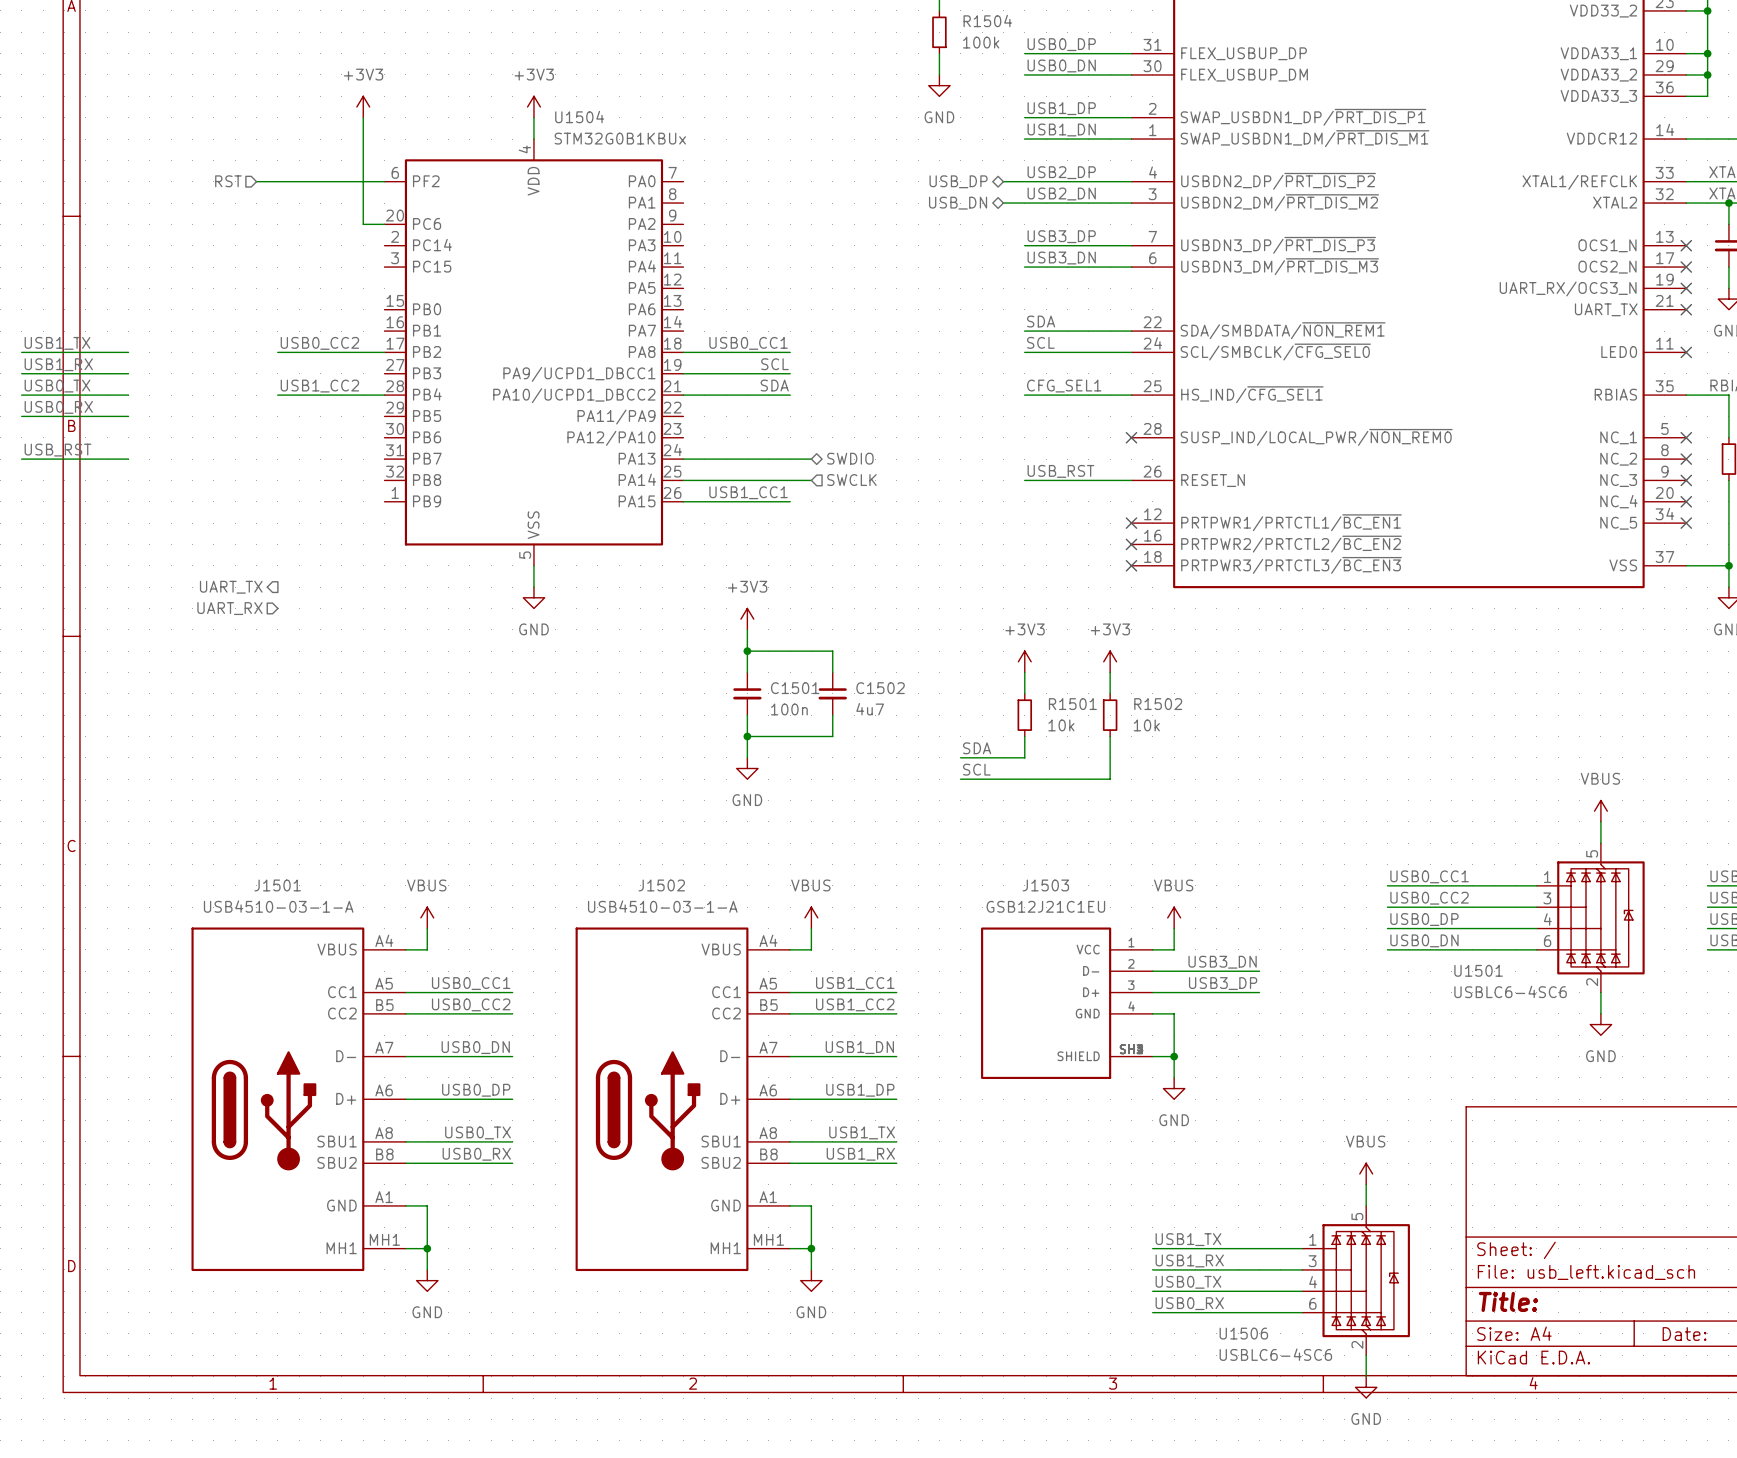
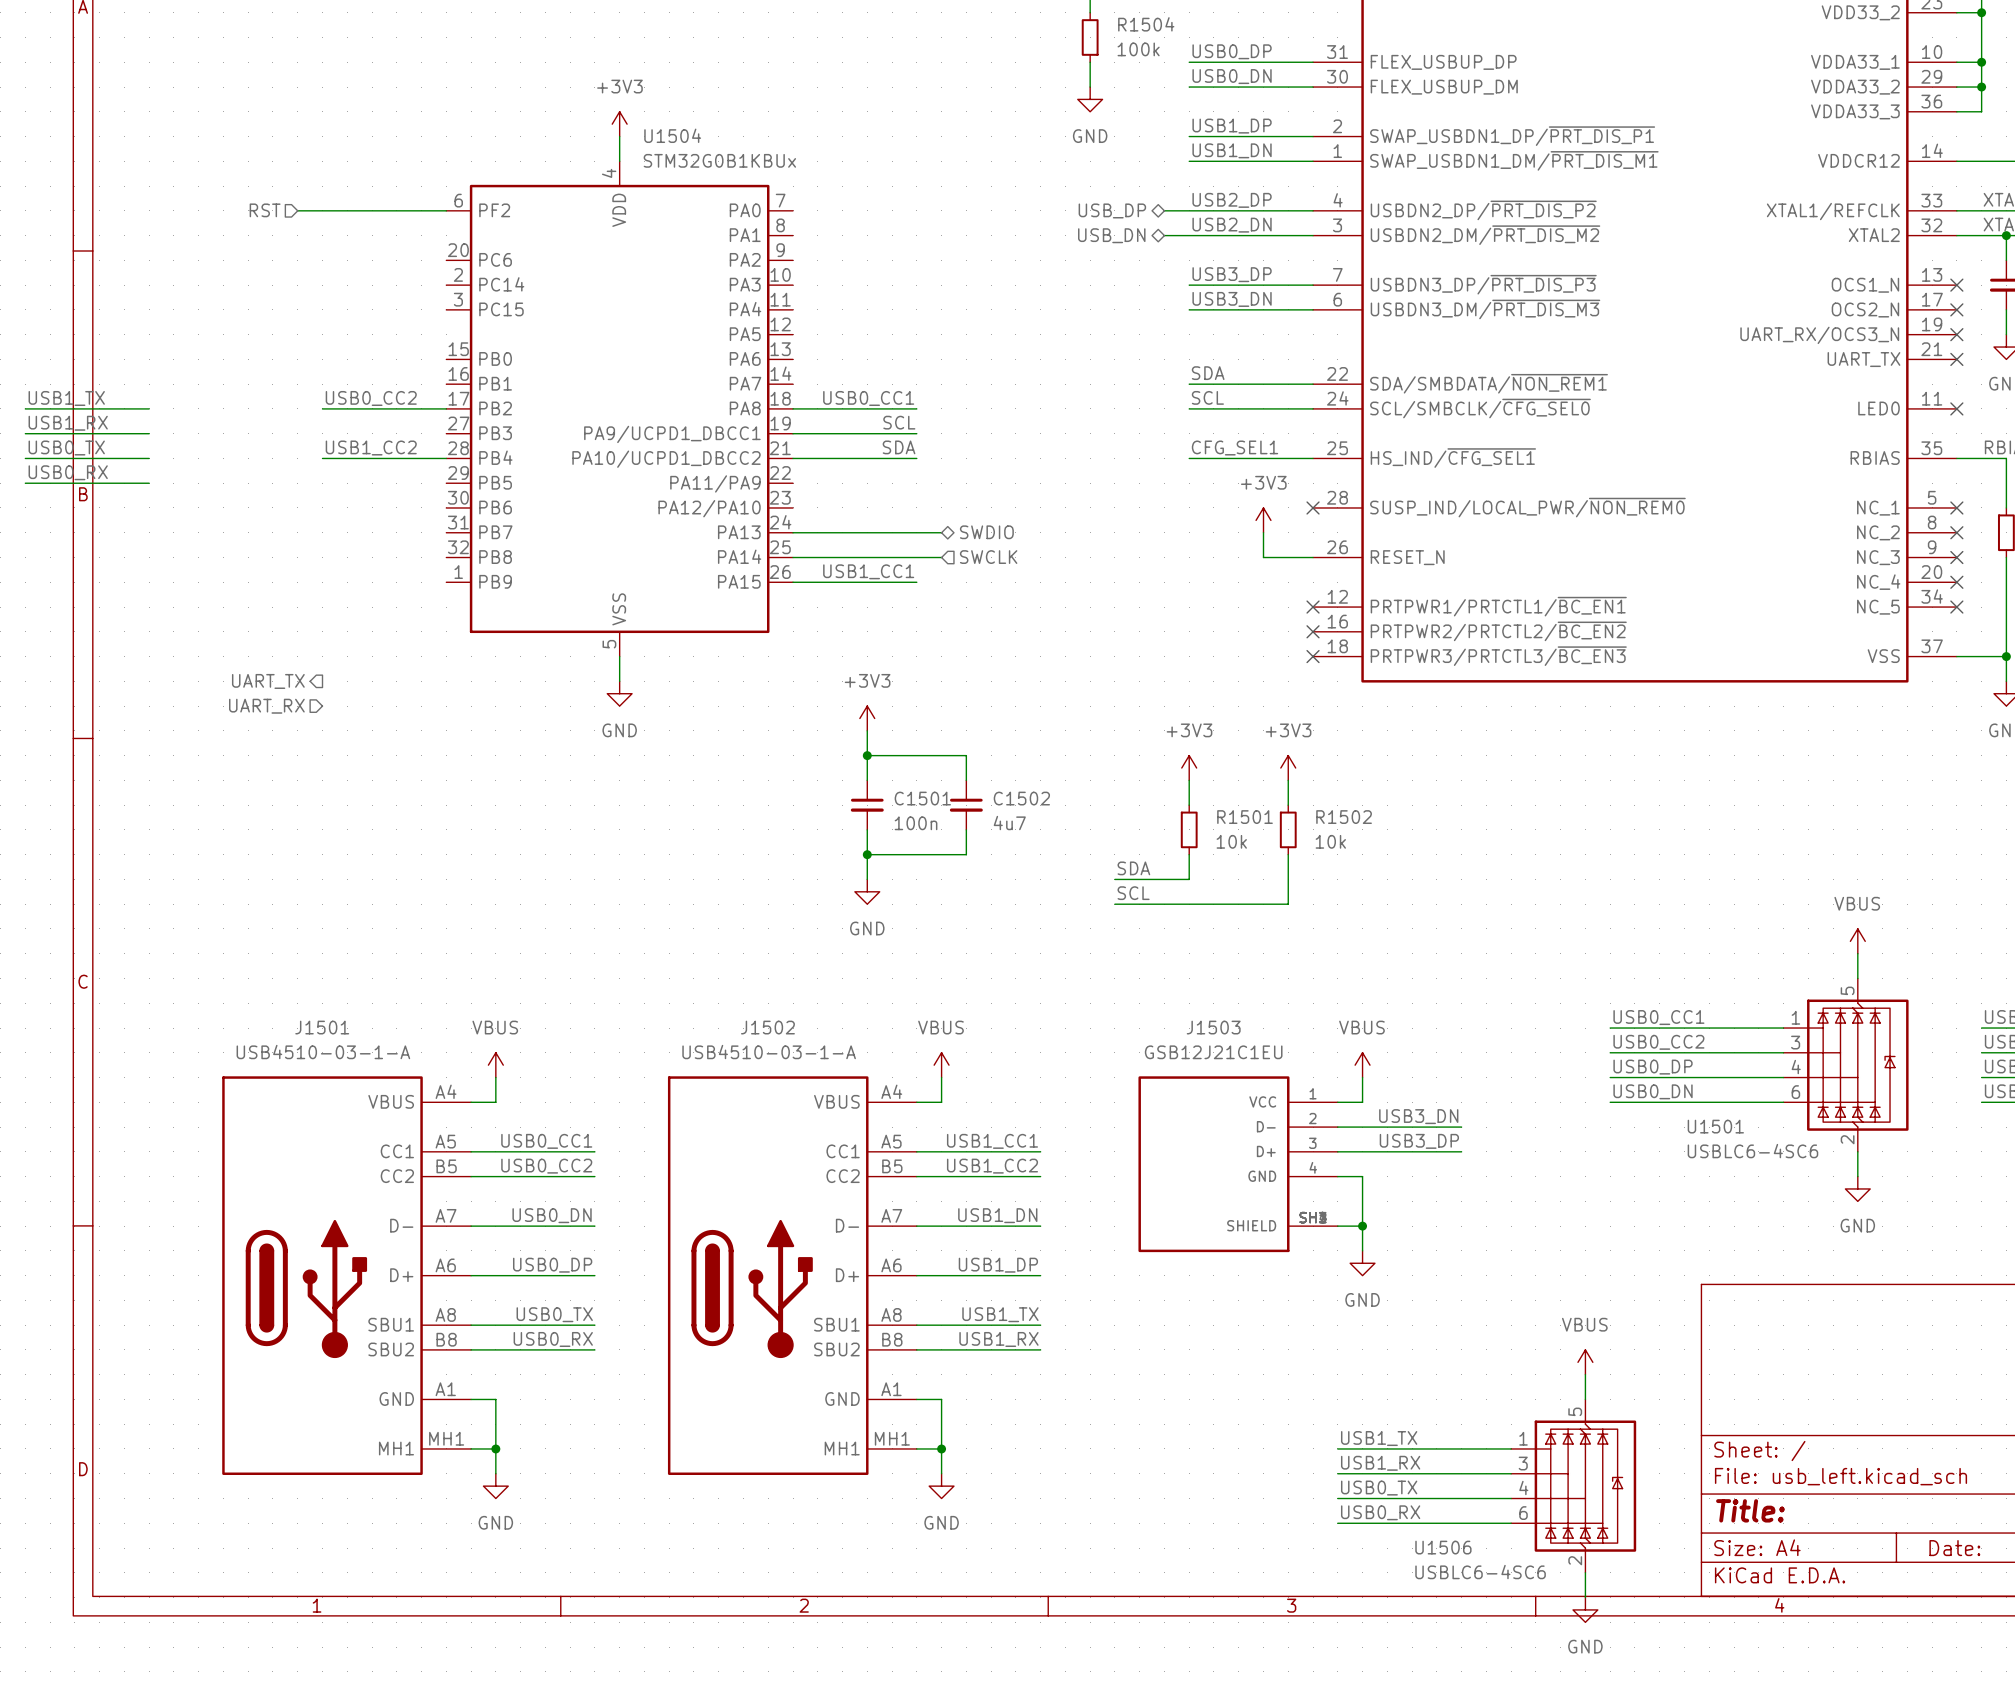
power symbol: +3V3 (363, 106) -> none
wire: (363, 117) (363, 224) (384, 224) -> none
power symbol: none -> +3V3 (1263, 520)
label: USB_RST (57, 450) -> none
wire: (21, 459) (128, 459) -> none
label: USB_RST (1060, 471) -> none
wire: (1024, 480) (1088, 480) -> (1263, 532) (1263, 557)

